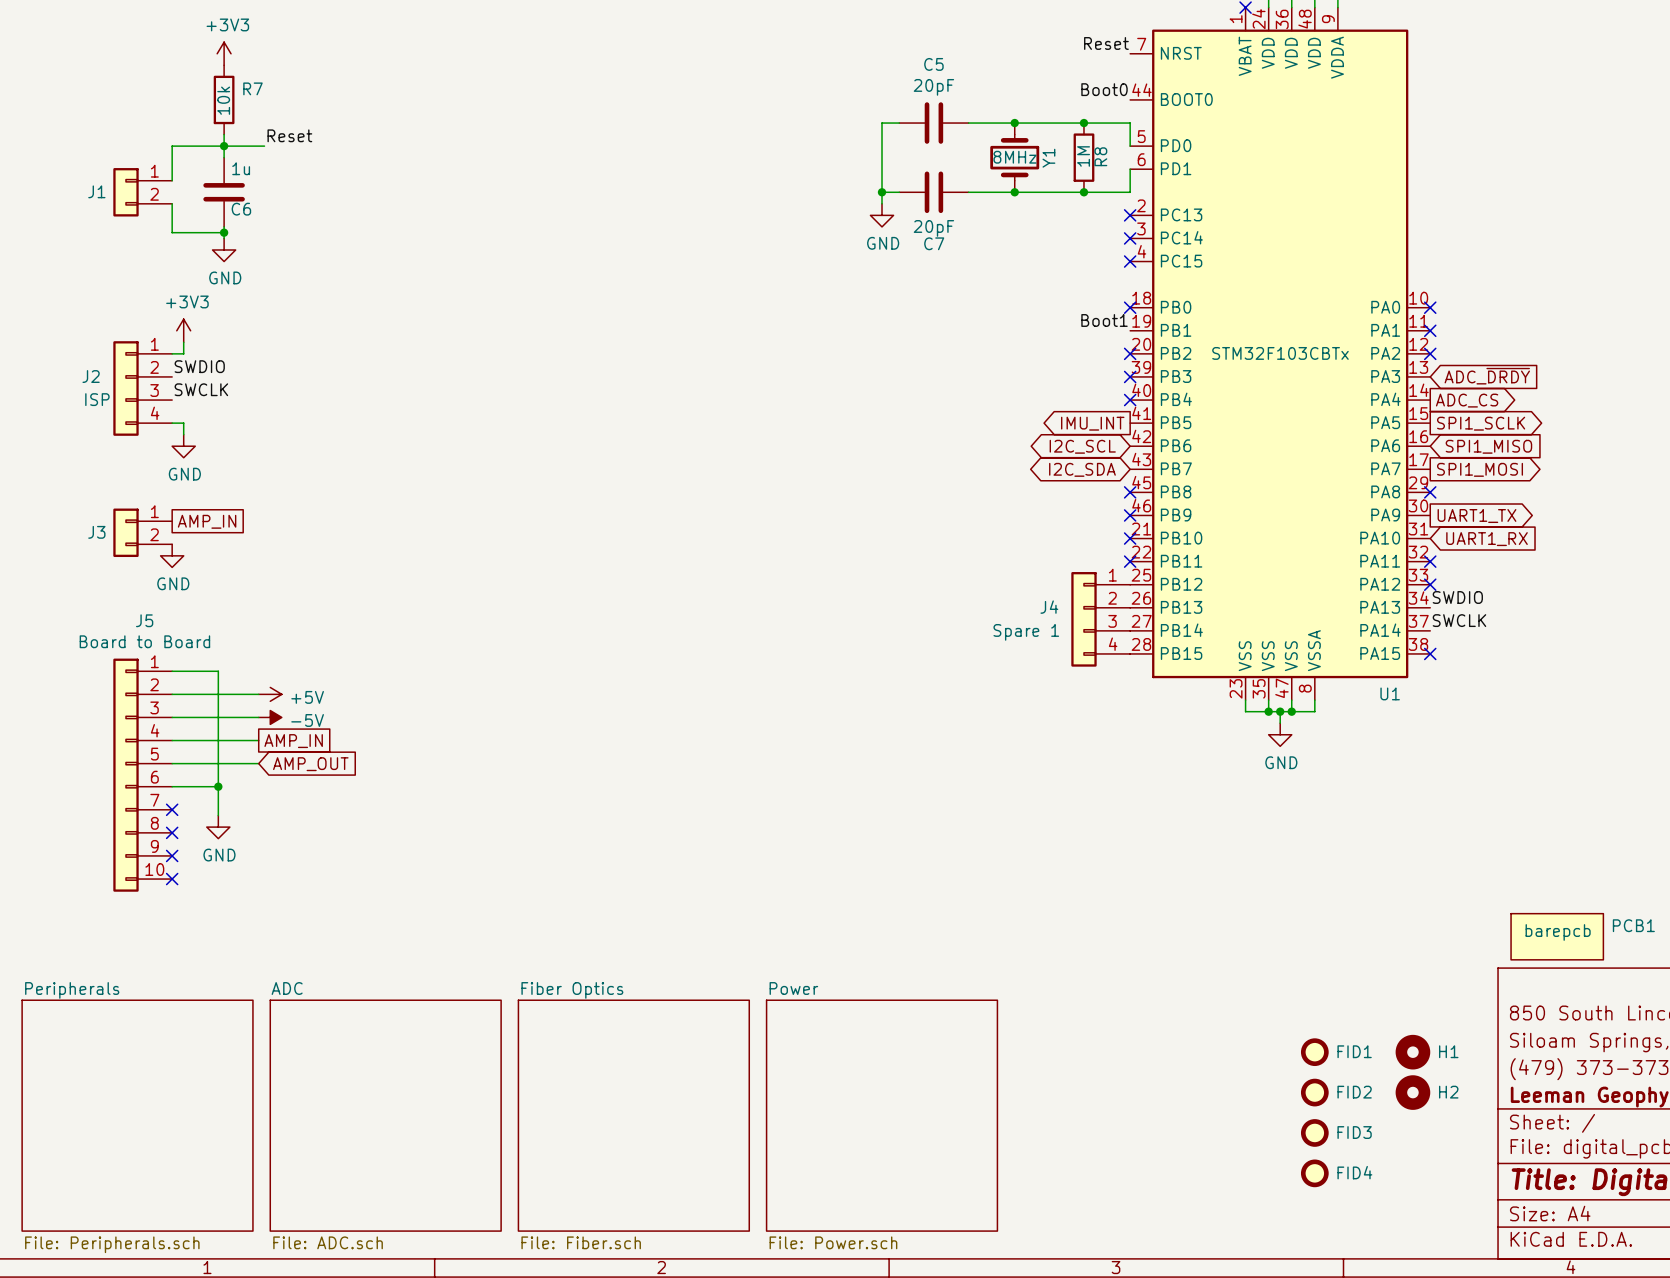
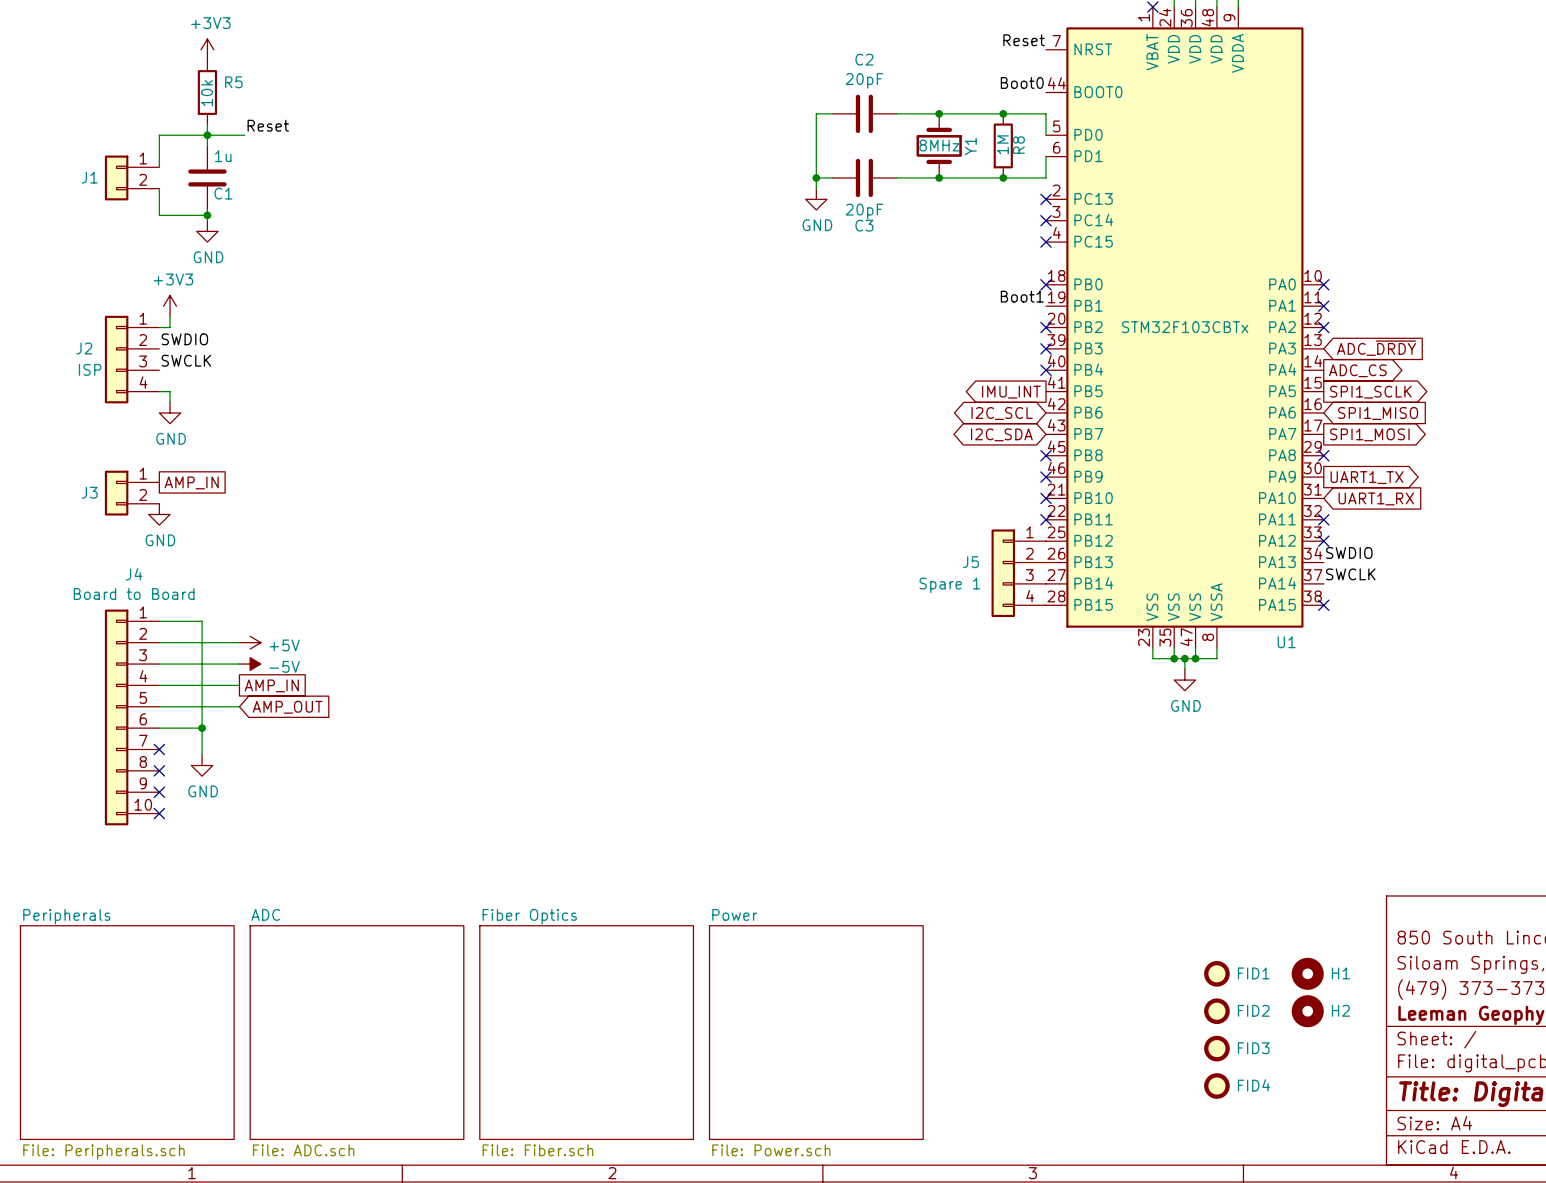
C5 name: C5 (933, 64) -> C2 (864, 59)
R7 name: R7 (252, 88) -> R5 (233, 82)
C6 name: C6 (241, 209) -> C1 (223, 193)
C7 name: C7 (934, 243) -> C3 (864, 225)
J4 name: J4 (1049, 607) -> J5 (970, 562)
J5 name: J5 (144, 620) -> J4 (134, 574)
PCB1: barepcb (1557, 936) -> none

